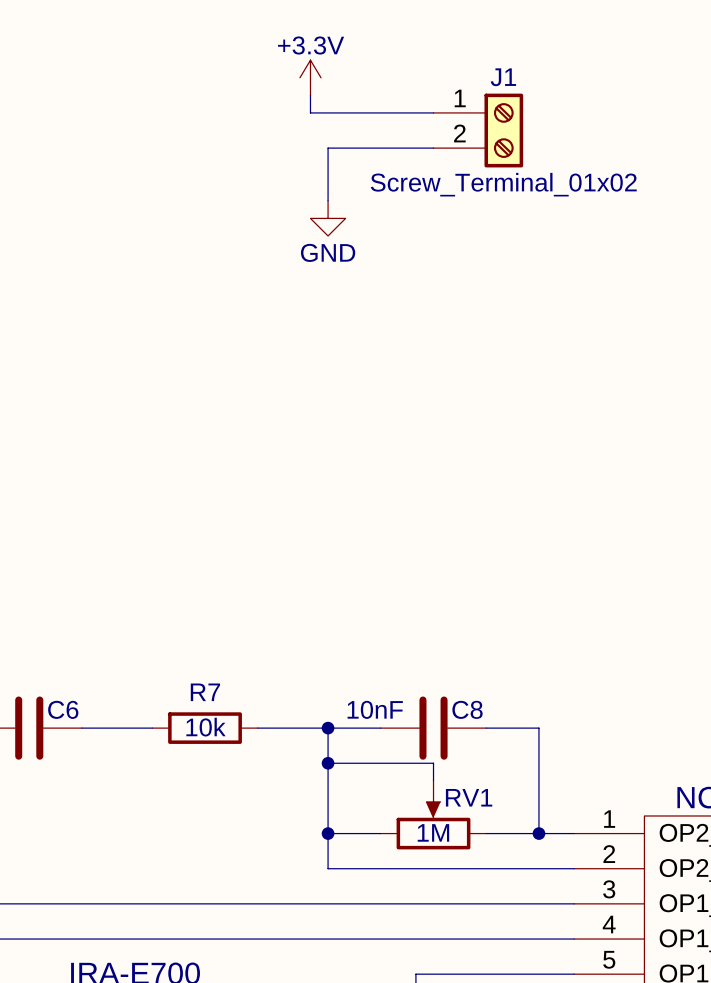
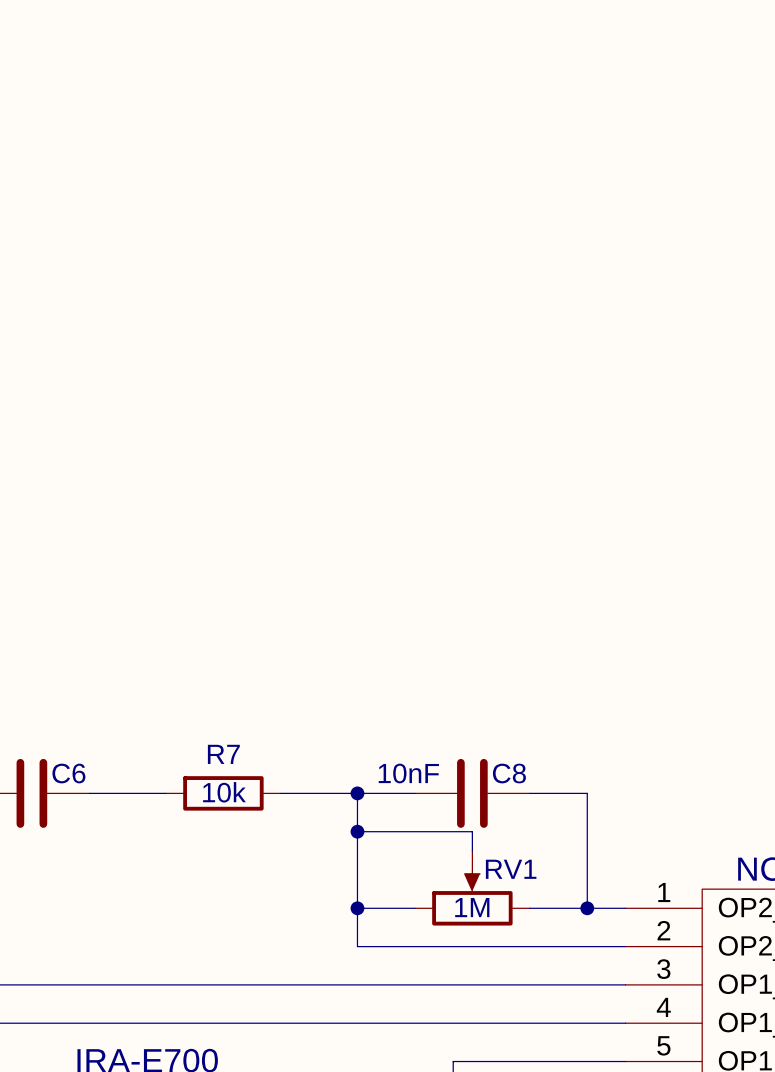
power symbol: +3.3V (310, 77) -> none
wire: (310, 95) (310, 112) (433, 112) -> none
J1: Screw_Terminal_01x02 (478, 130) -> none
wire: (433, 148) (328, 148) (328, 200) -> none
power symbol: GND (328, 218) -> none

